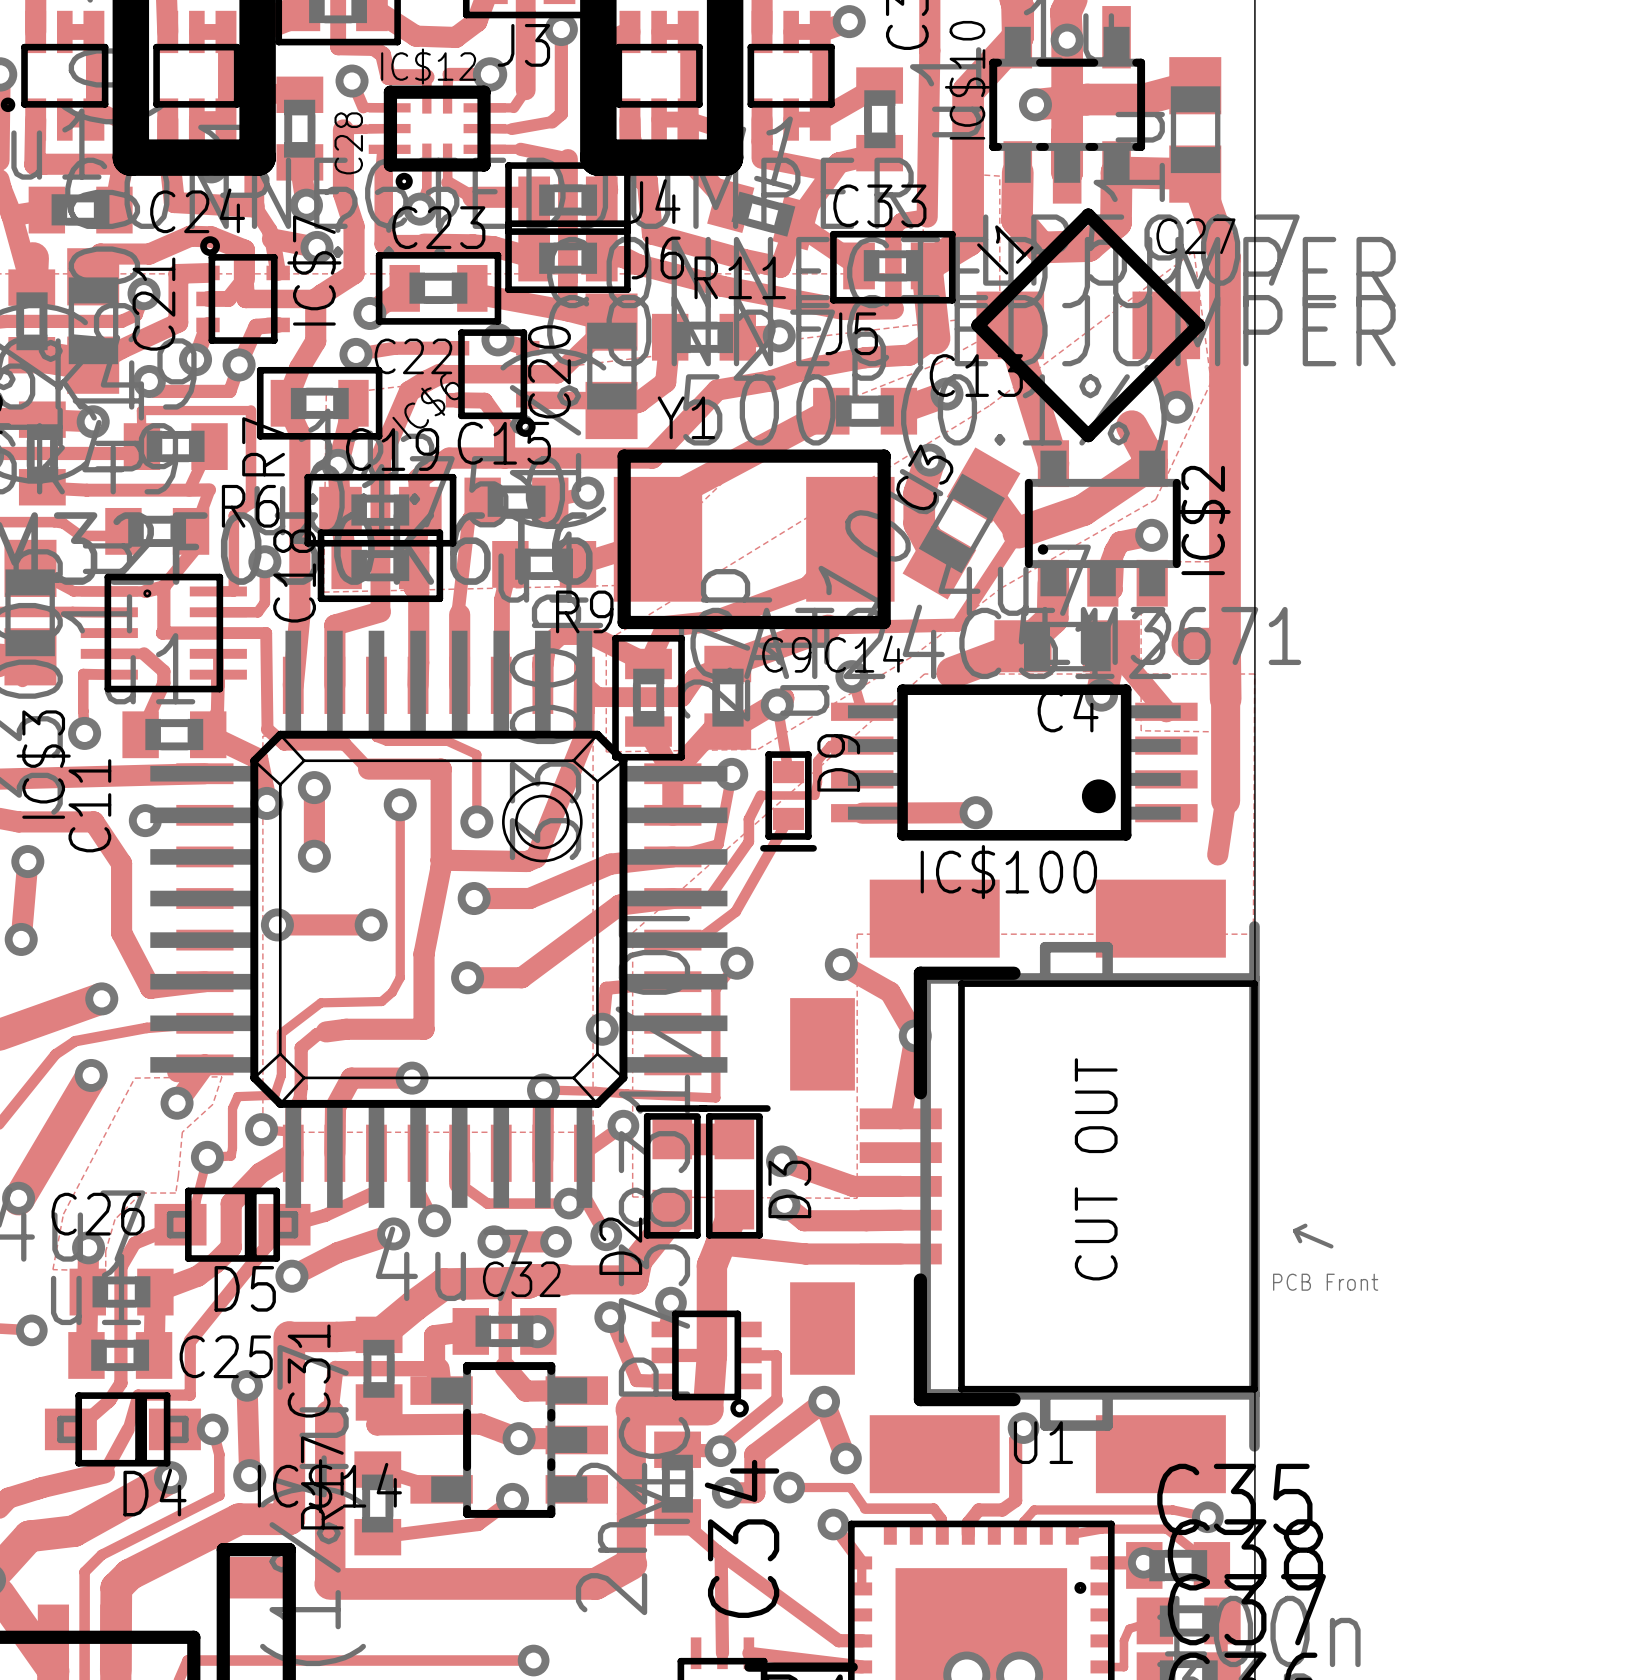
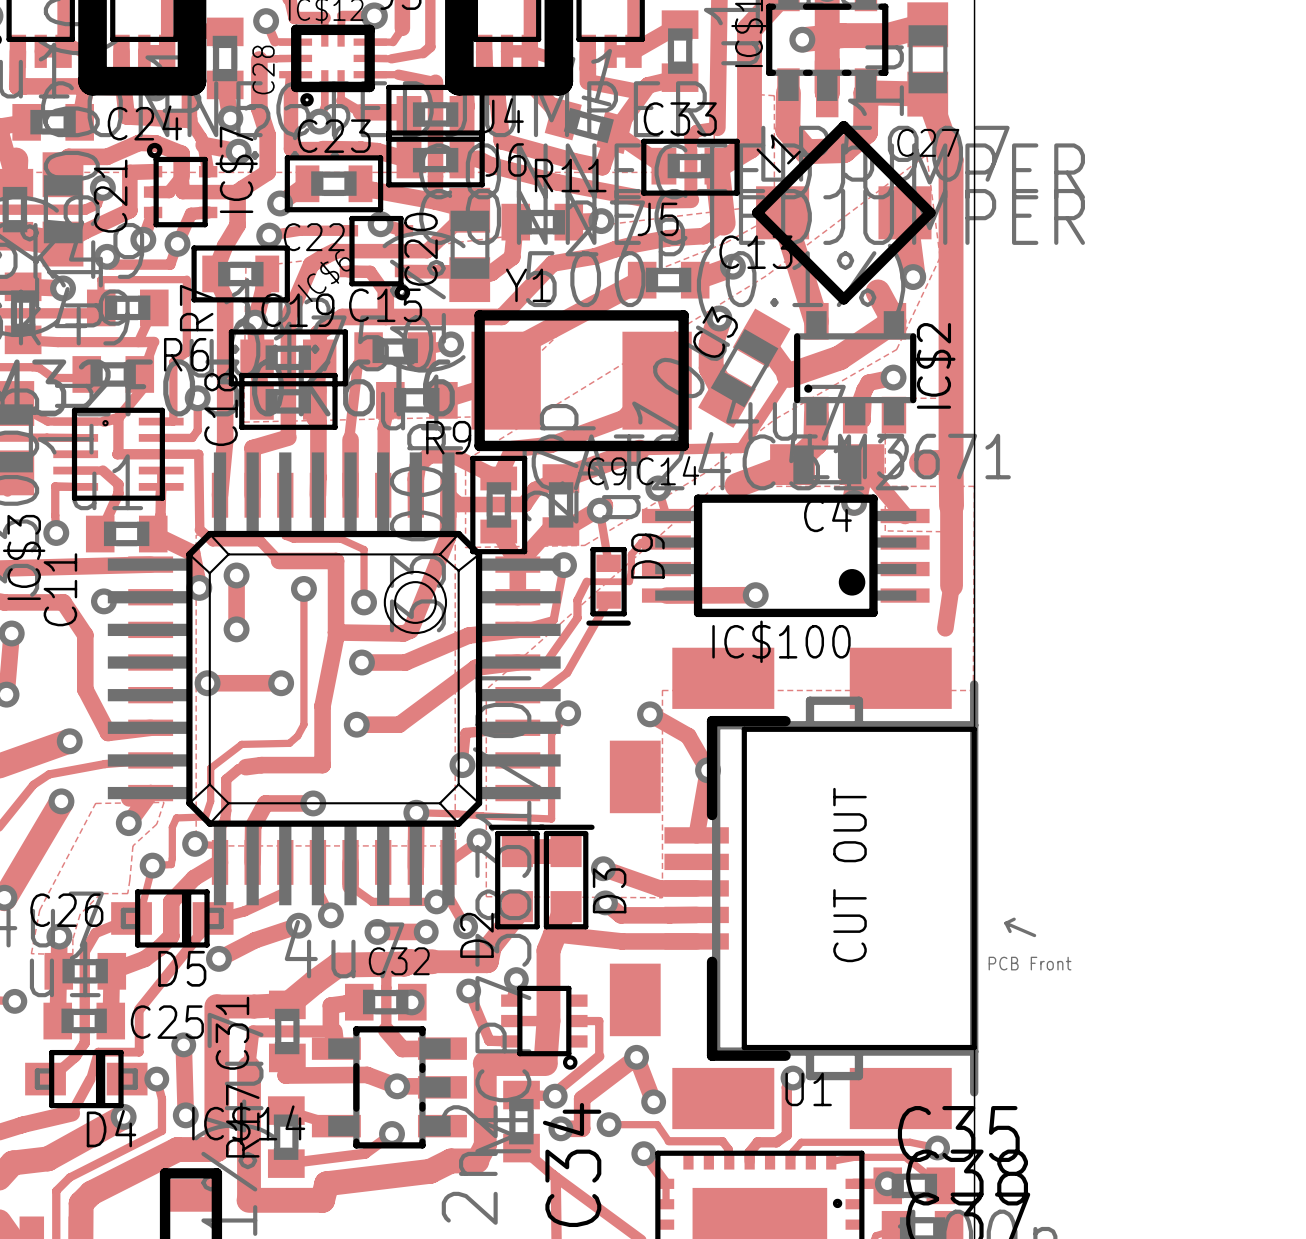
track: (631, 1513) (631, 1564) (595, 1583) (424, 1583) -> (485, 1145) (476, 1160) (451, 1160) (430, 1171) (326, 1183) (322, 1200)

